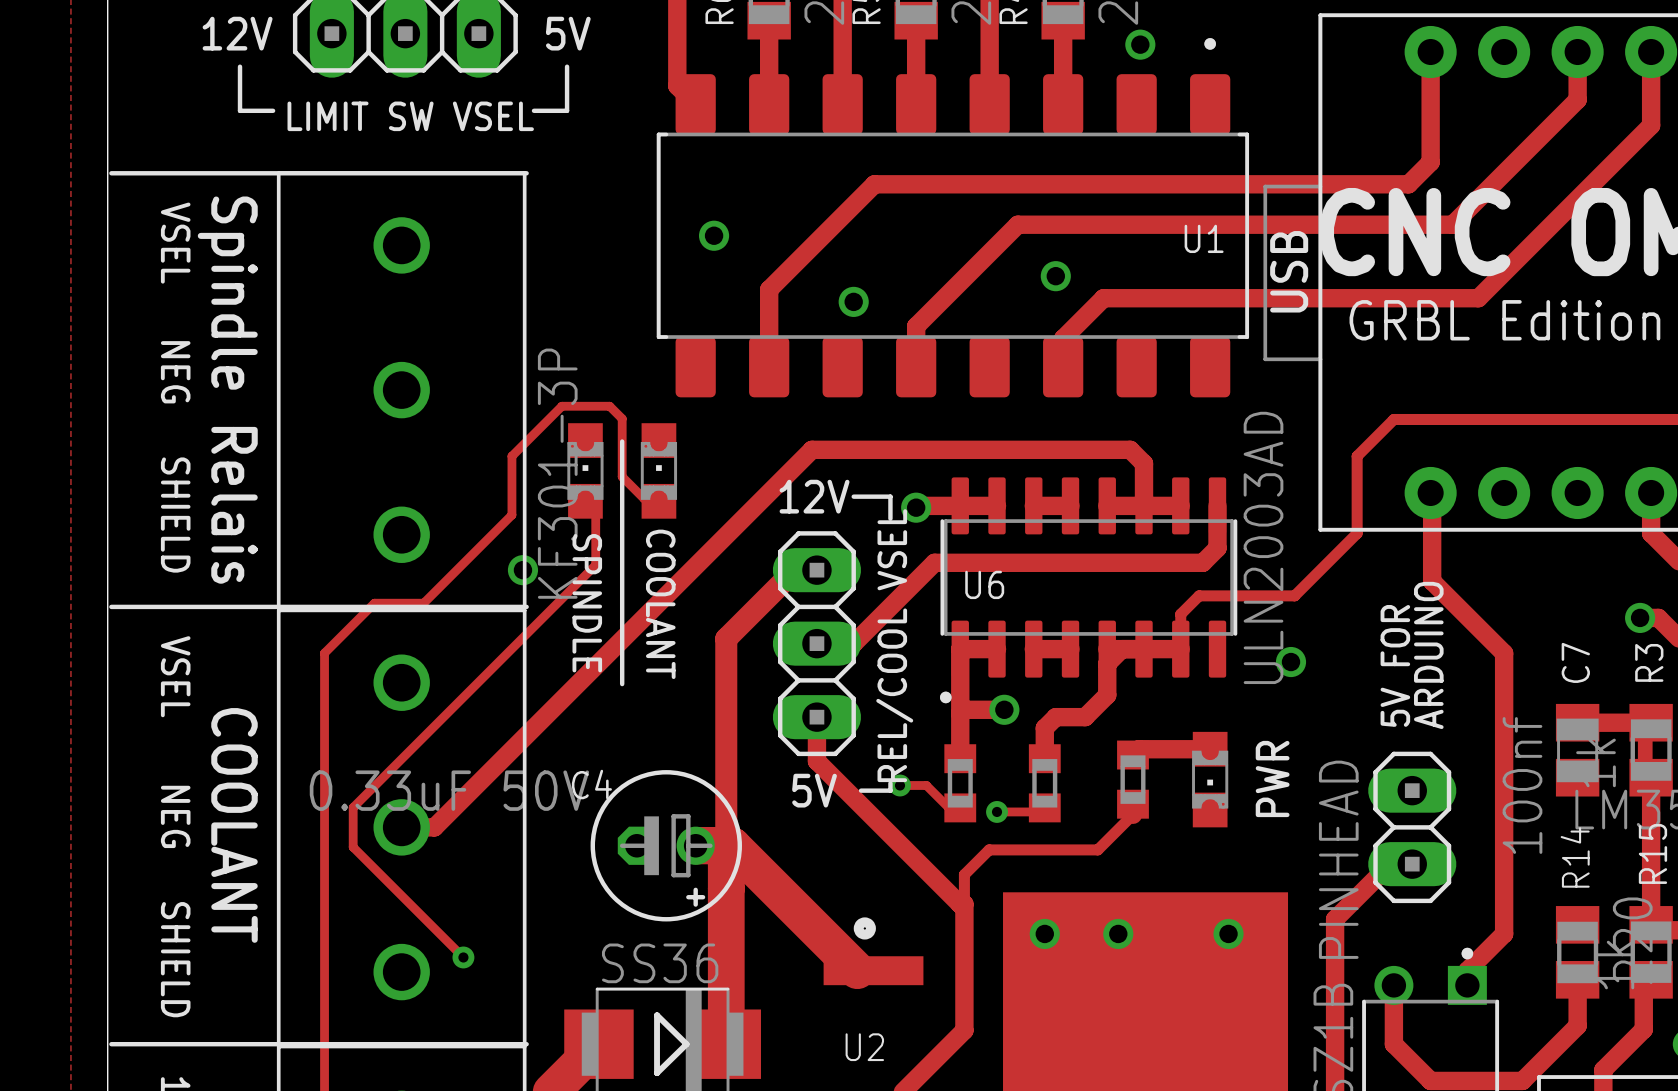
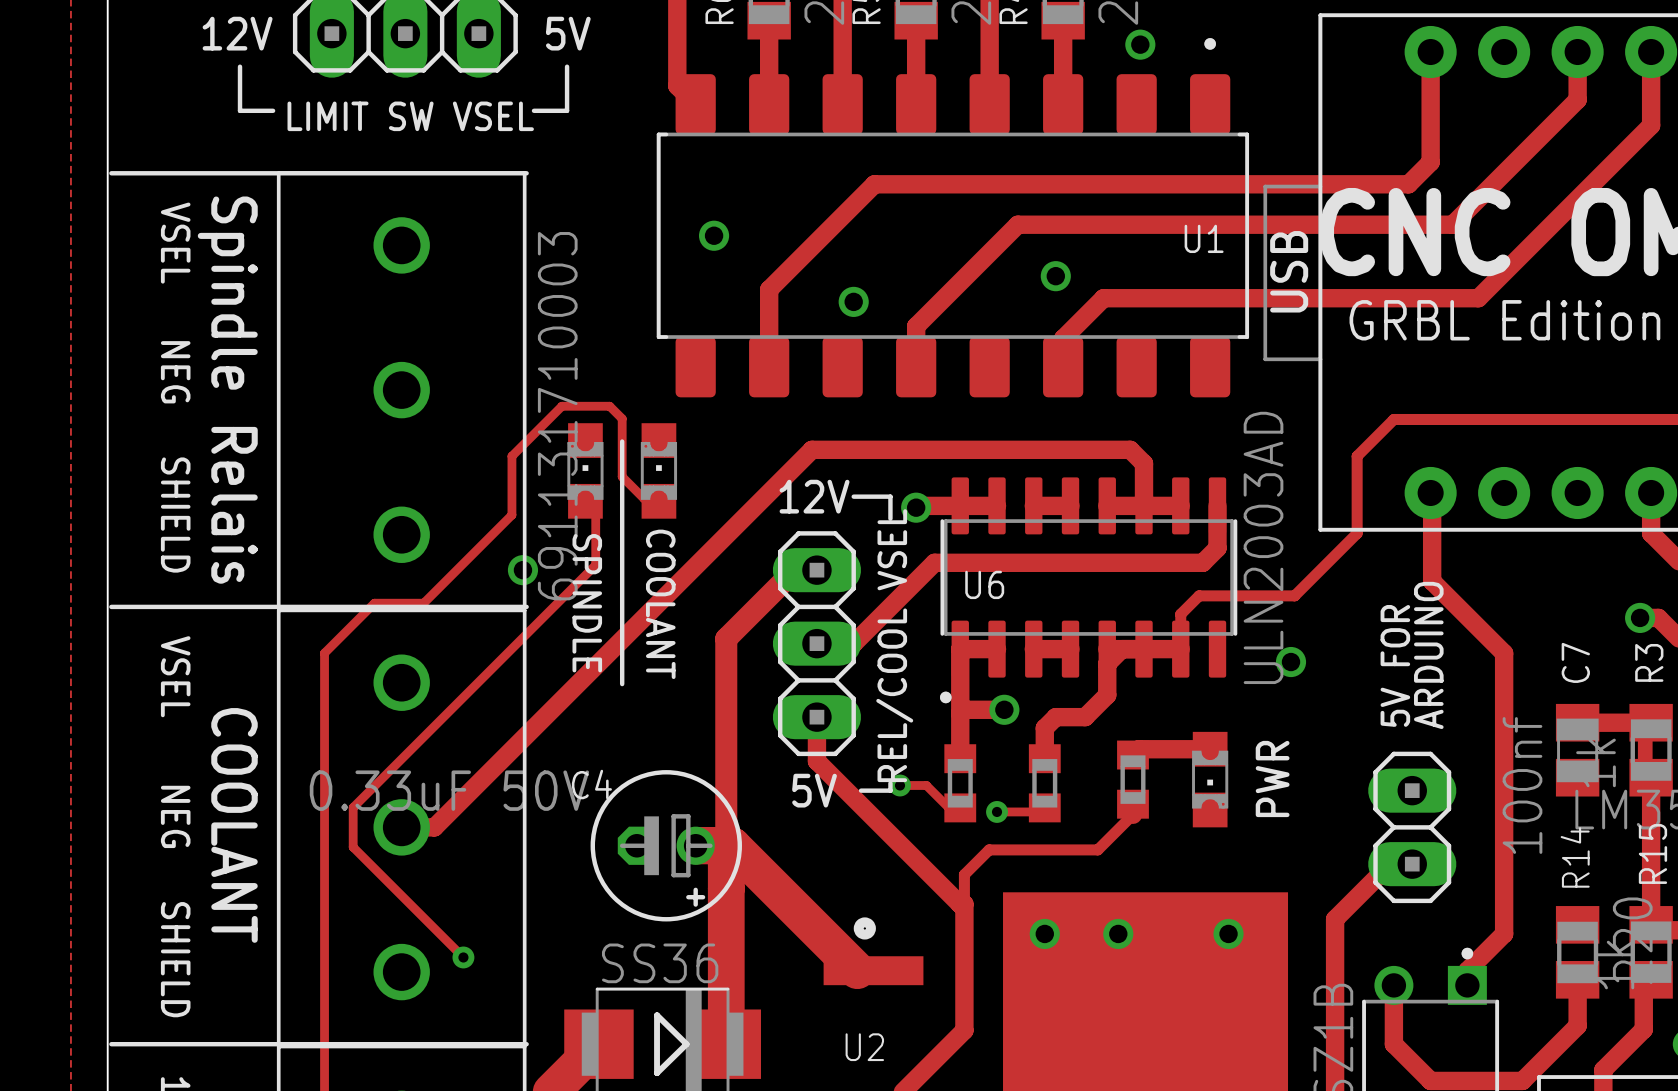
part value: KF301-3P (557, 473) -> 691131710003 (557, 416)
part value: PINHEAD (1338, 859) -> none

